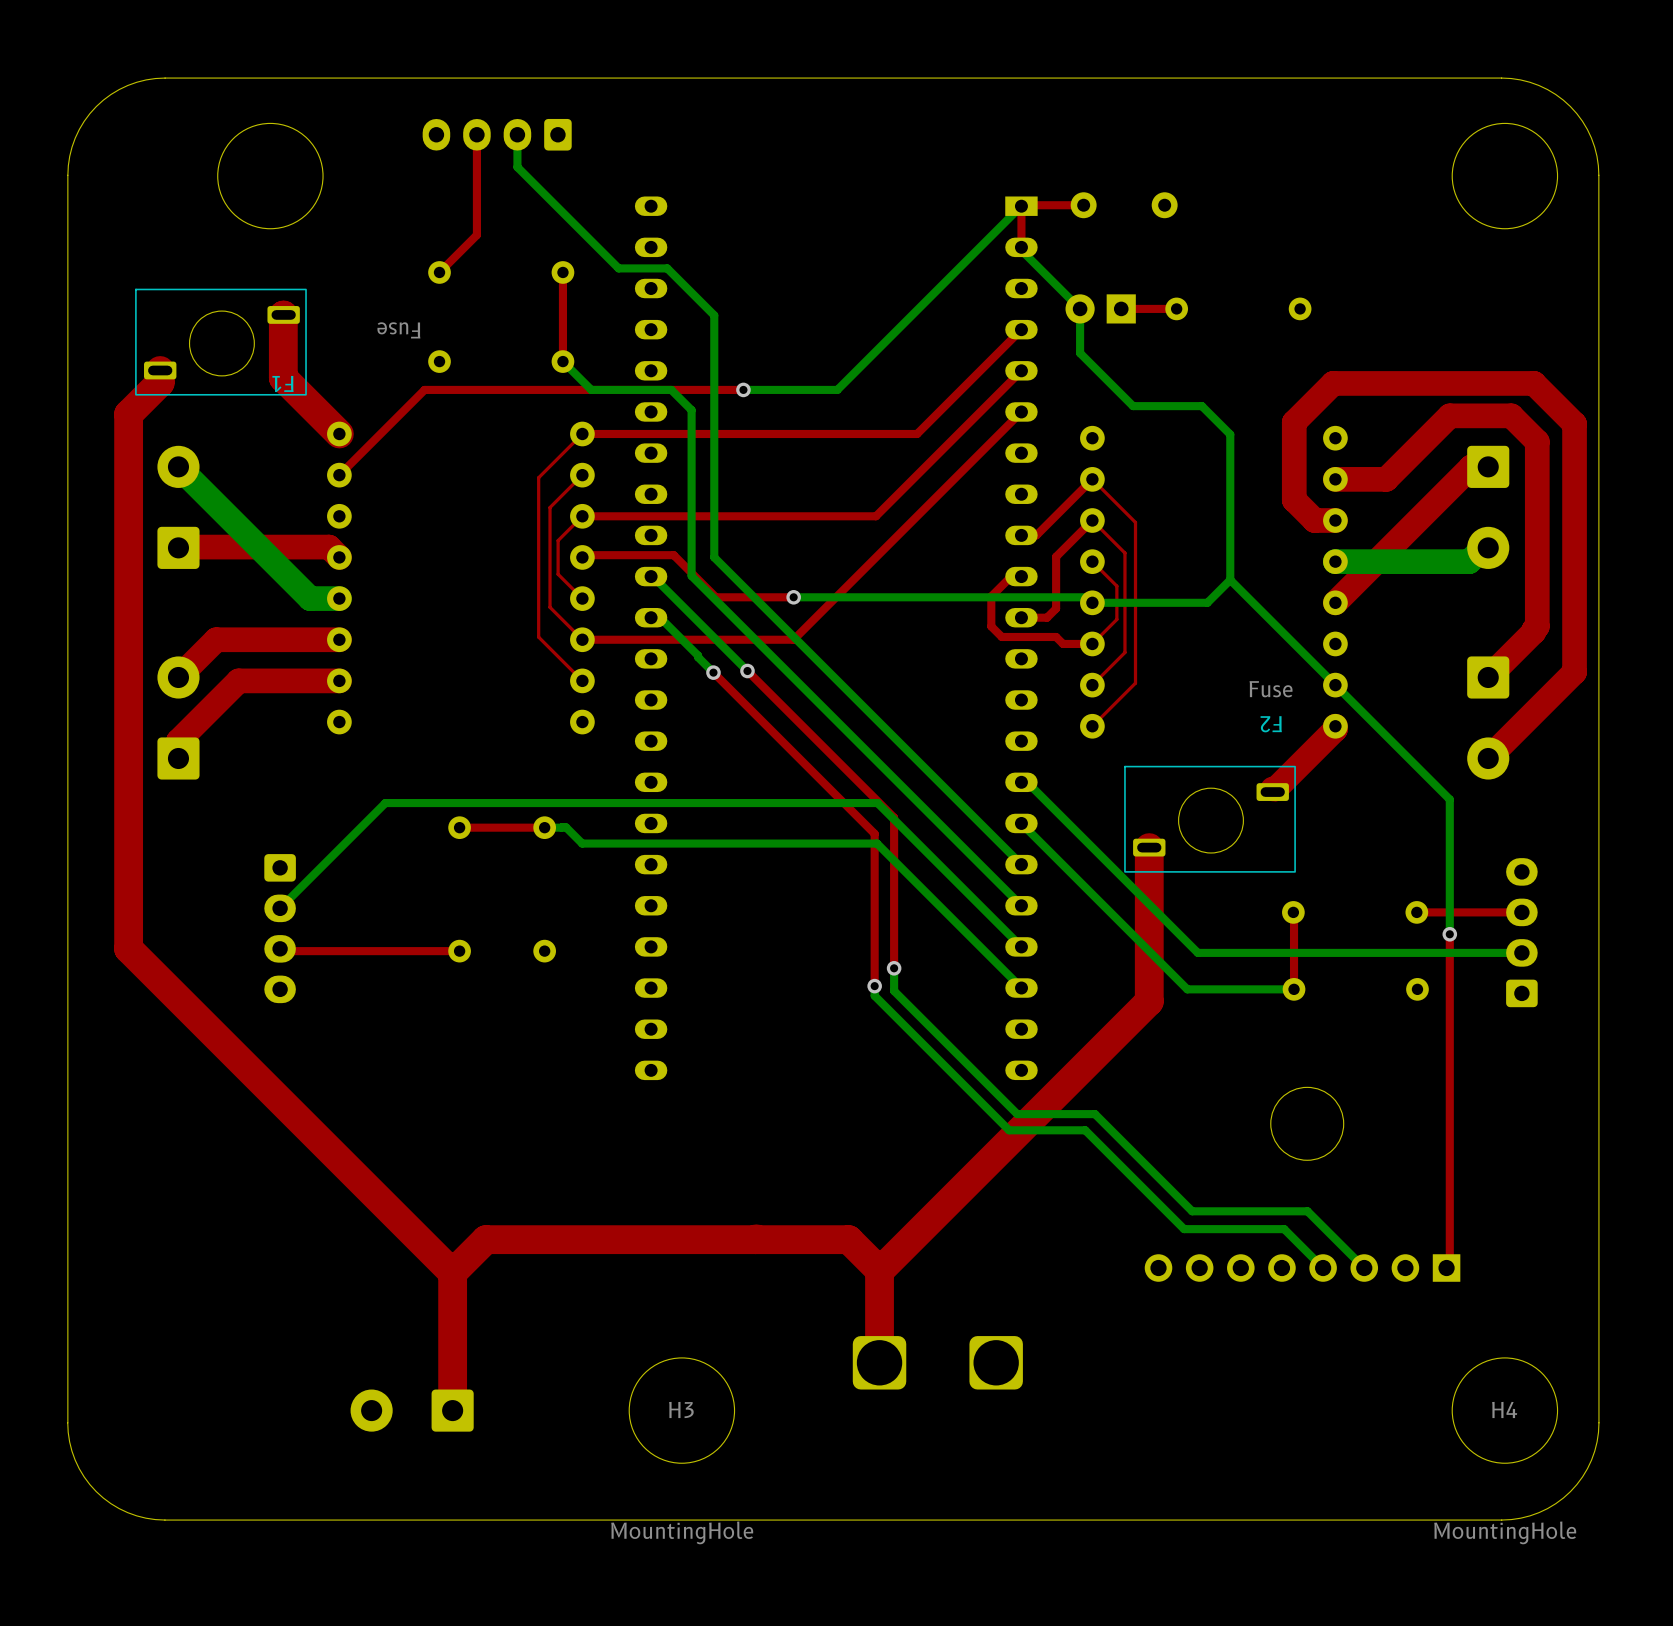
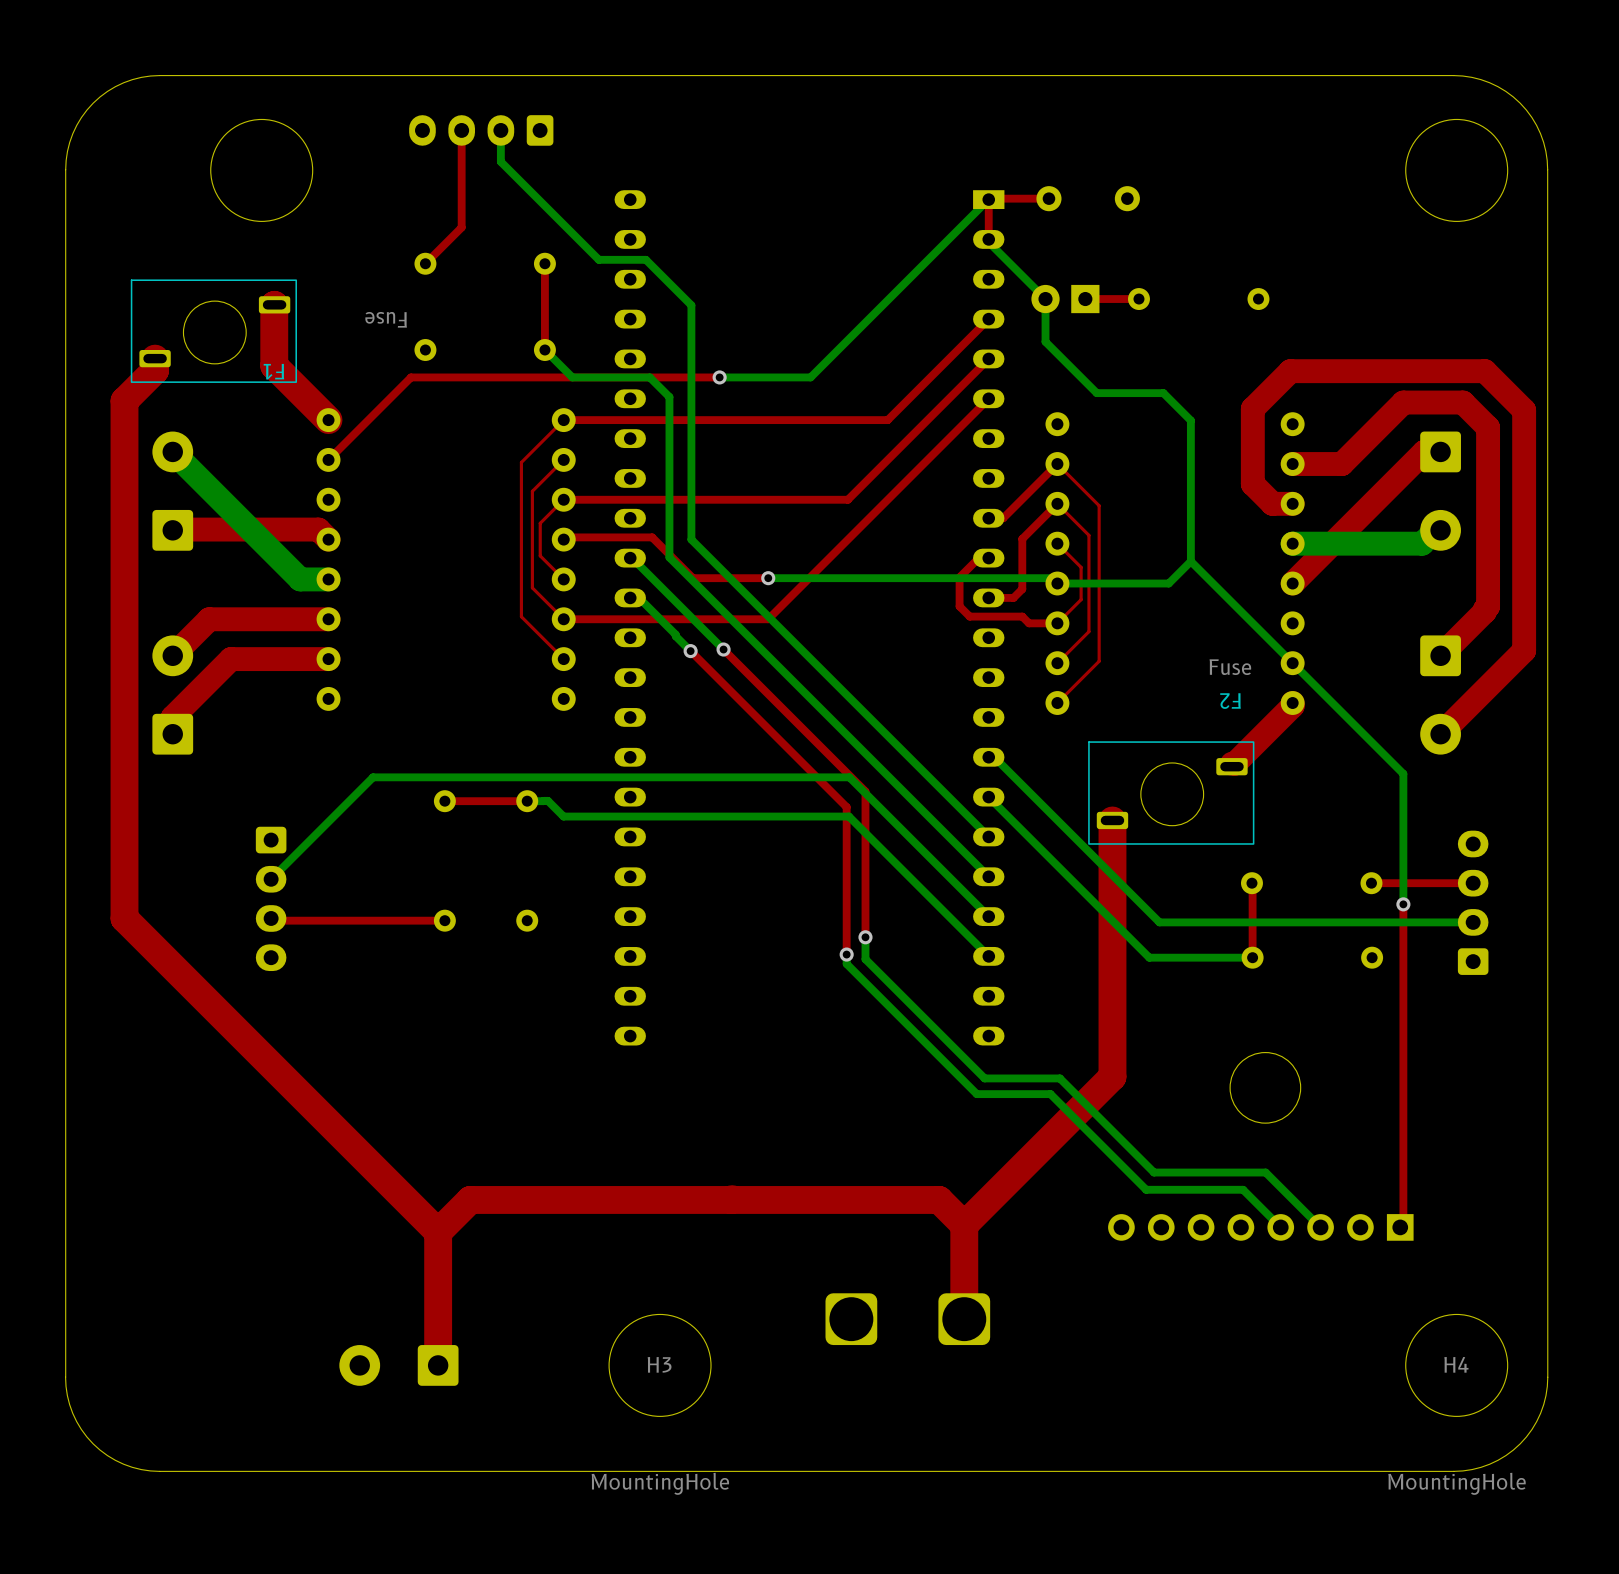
top track: (1149, 1001) (879, 1271) -> (1112, 969) (1112, 1076) (964, 1225)
top track: (848, 1239) (879, 1270) (879, 1362) -> (821, 1199) (939, 1199) (964, 1225)
top track: none -> (964, 1225) (964, 1319)

